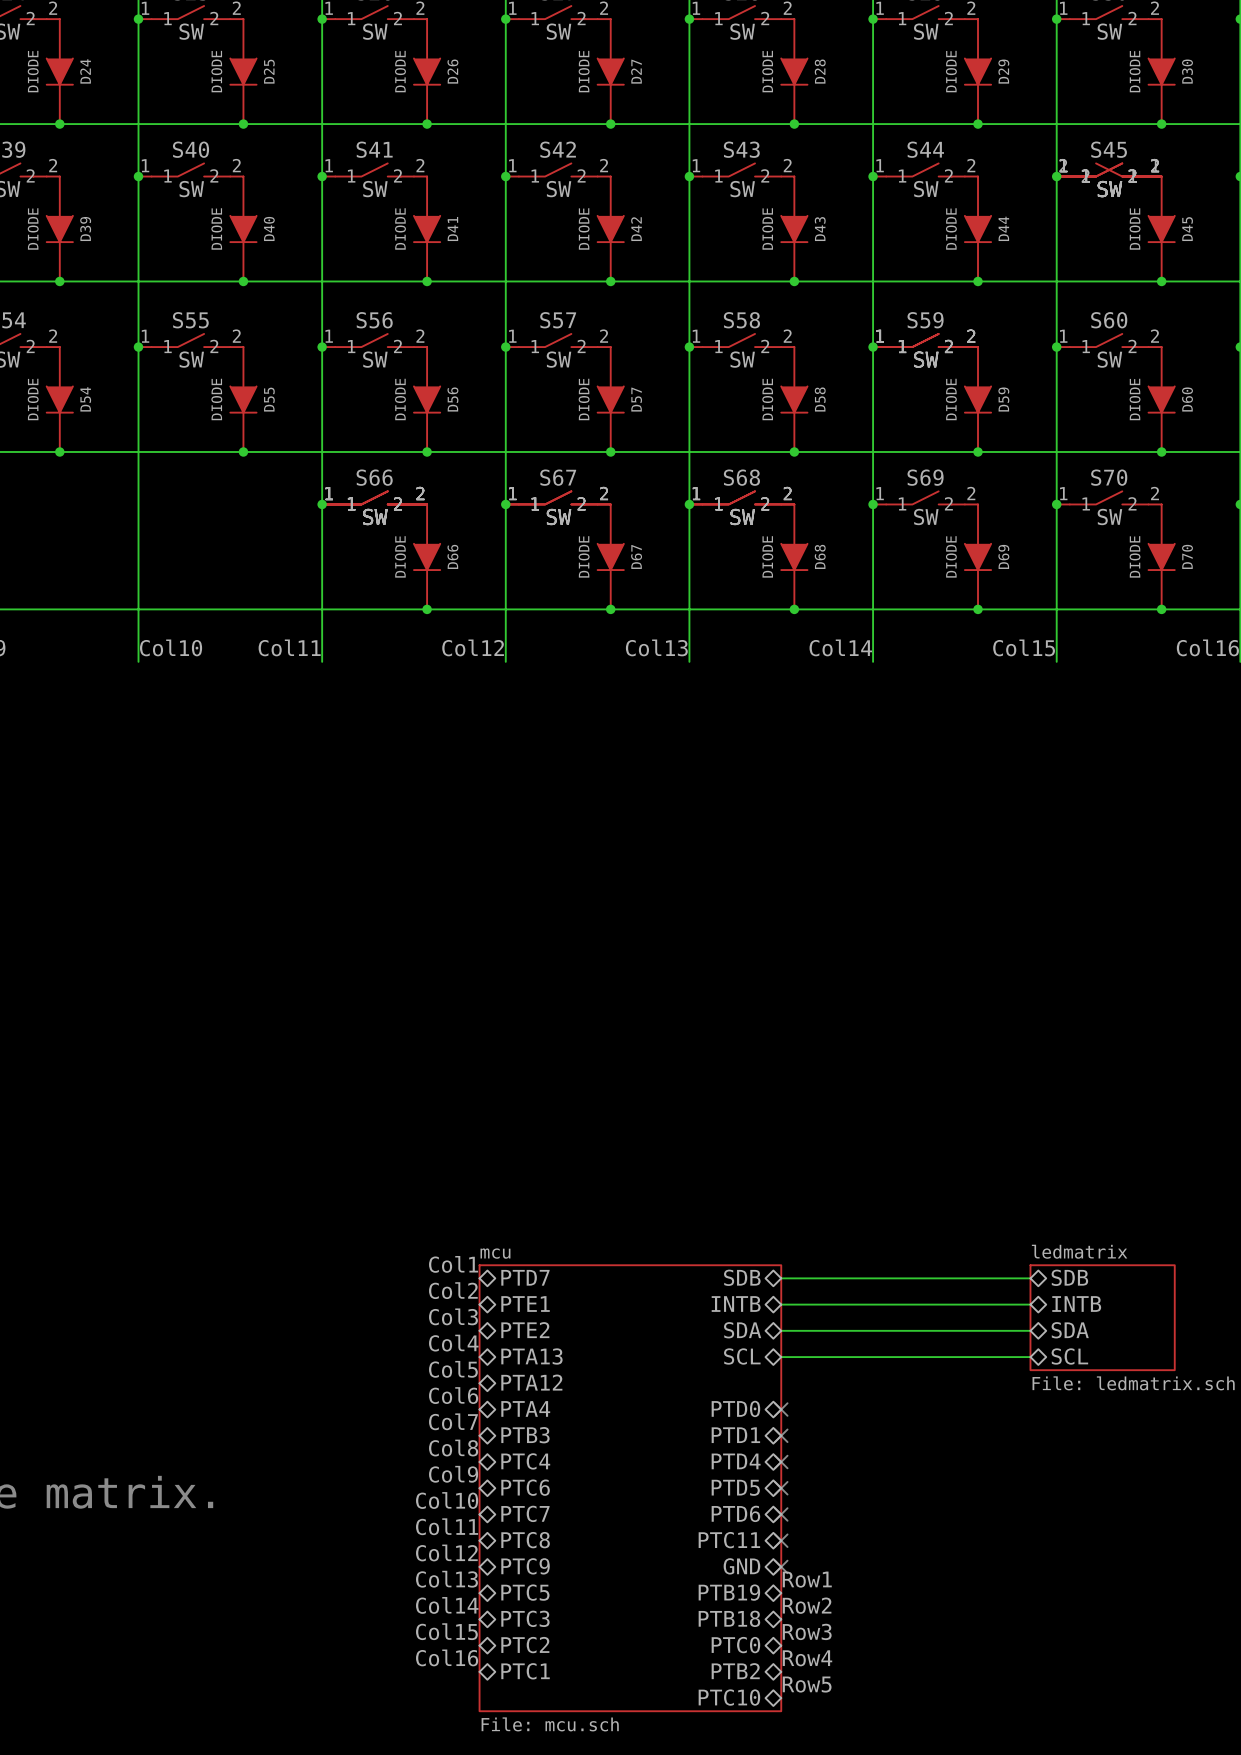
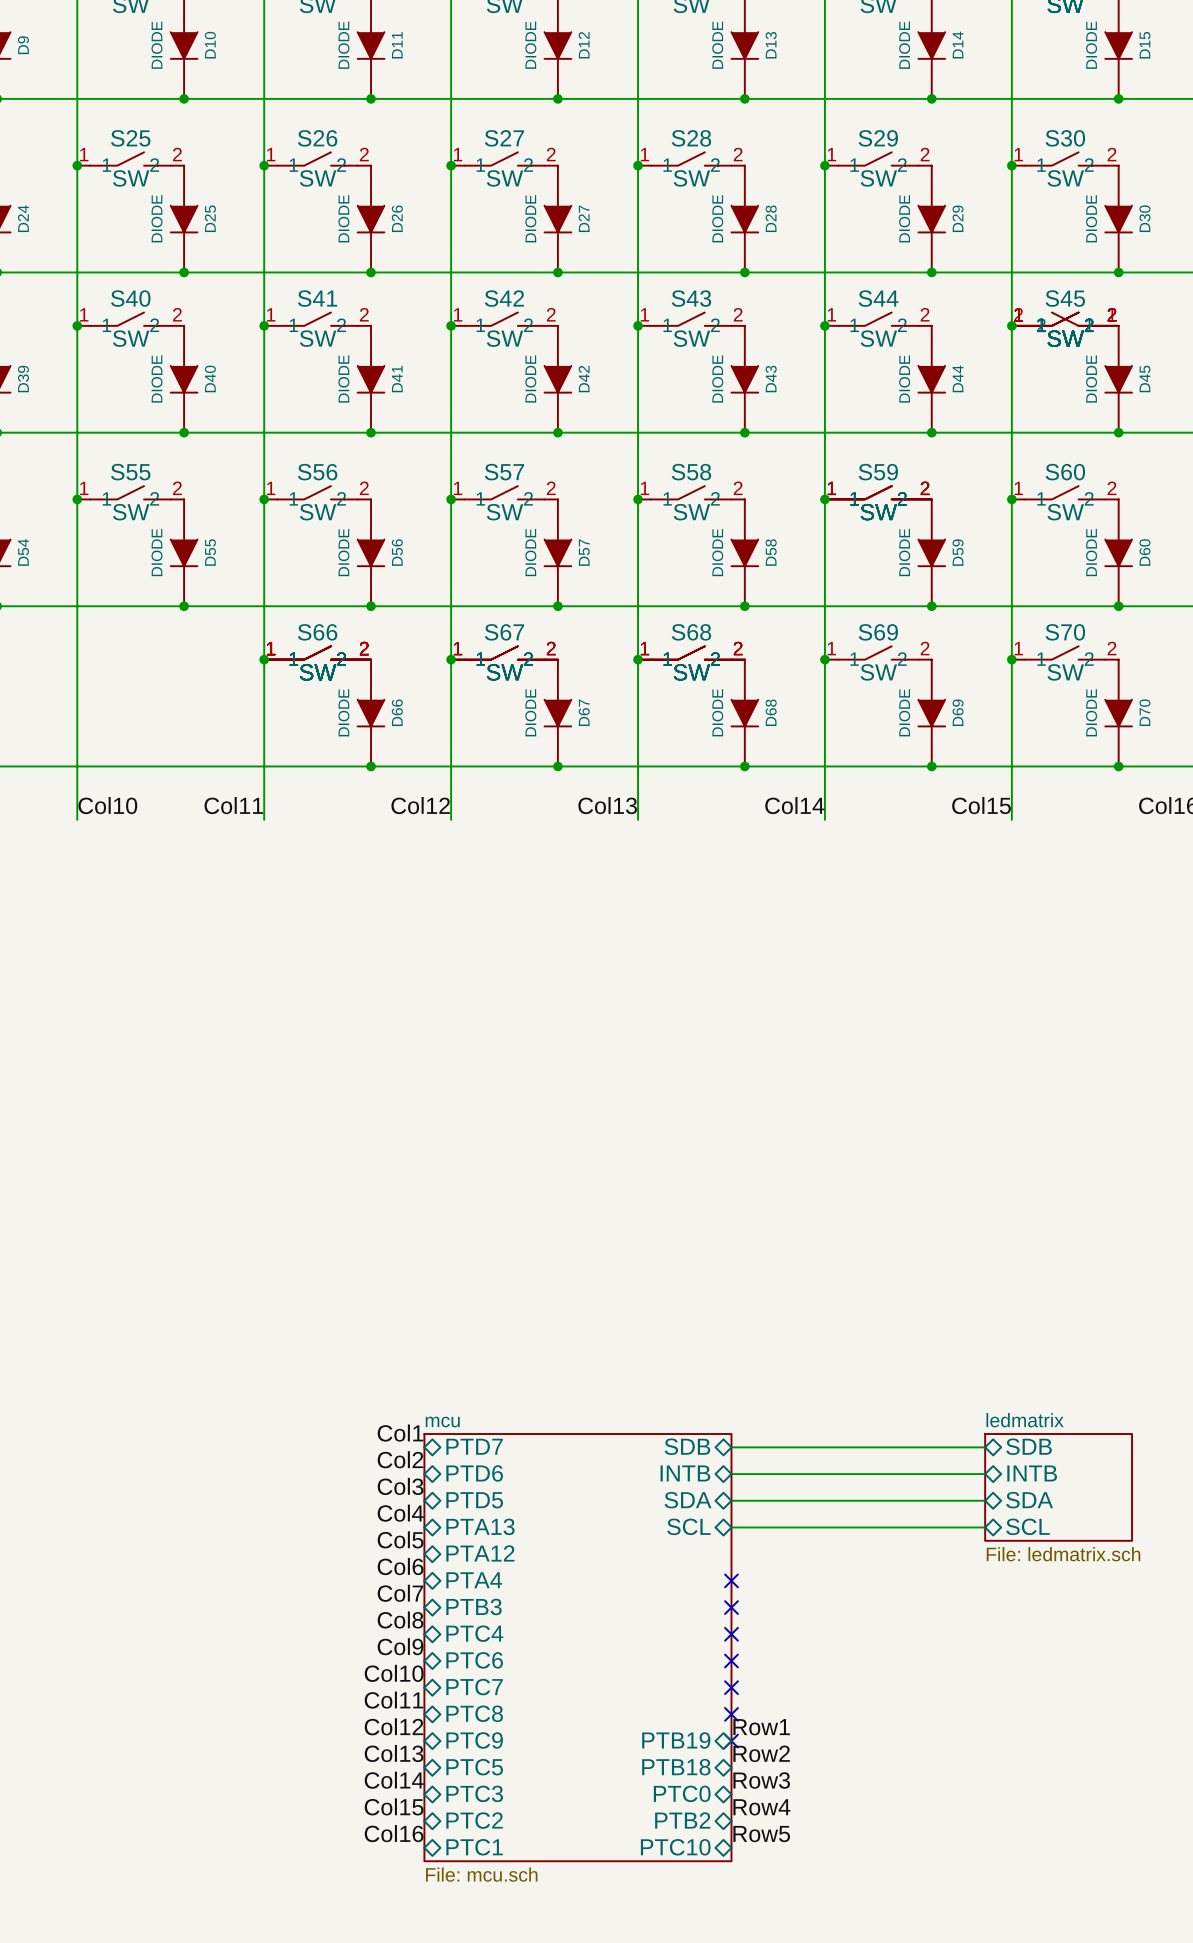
sheet pin: PTE1 (525, 1304) -> PTD6 (474, 1473)
sheet pin: PTE2 (525, 1330) -> PTD5 (474, 1500)
sheet pin: PTD0 (735, 1408) -> none
sheet pin: PTD1 (735, 1435) -> none
sheet pin: PTD4 (736, 1461) -> none
sheet mcu: none -> File: mcu.sch (577, 1647)
sheet pin: PTD5 (735, 1487) -> none
sheet mcu: File: mcu.sch (630, 1488) -> none
sheet pin: PTD6 (735, 1513) -> none
sheet pin: PTC11 (729, 1540) -> none
label: none -> Row1 (761, 1727)
sheet pin: GND (741, 1566) -> PTB19 (676, 1740)
label: Row1 (807, 1579) -> Row2 (761, 1753)
sheet pin: PTB19 (729, 1592) -> PTB18 (676, 1767)
label: Row2 (807, 1605) -> Row3 (761, 1780)
sheet pin: PTB18 (729, 1618) -> PTC0 (682, 1793)
label: Row3 (807, 1631) -> Row4 (761, 1807)
sheet pin: PTC0 (735, 1645) -> PTB2 (682, 1820)
label: Row4 (807, 1658) -> Row5 (761, 1834)
sheet pin: PTB2 (735, 1671) -> PTC10 (675, 1847)
label: Row5 (807, 1684) -> none
sheet pin: PTC10 (729, 1697) -> none

